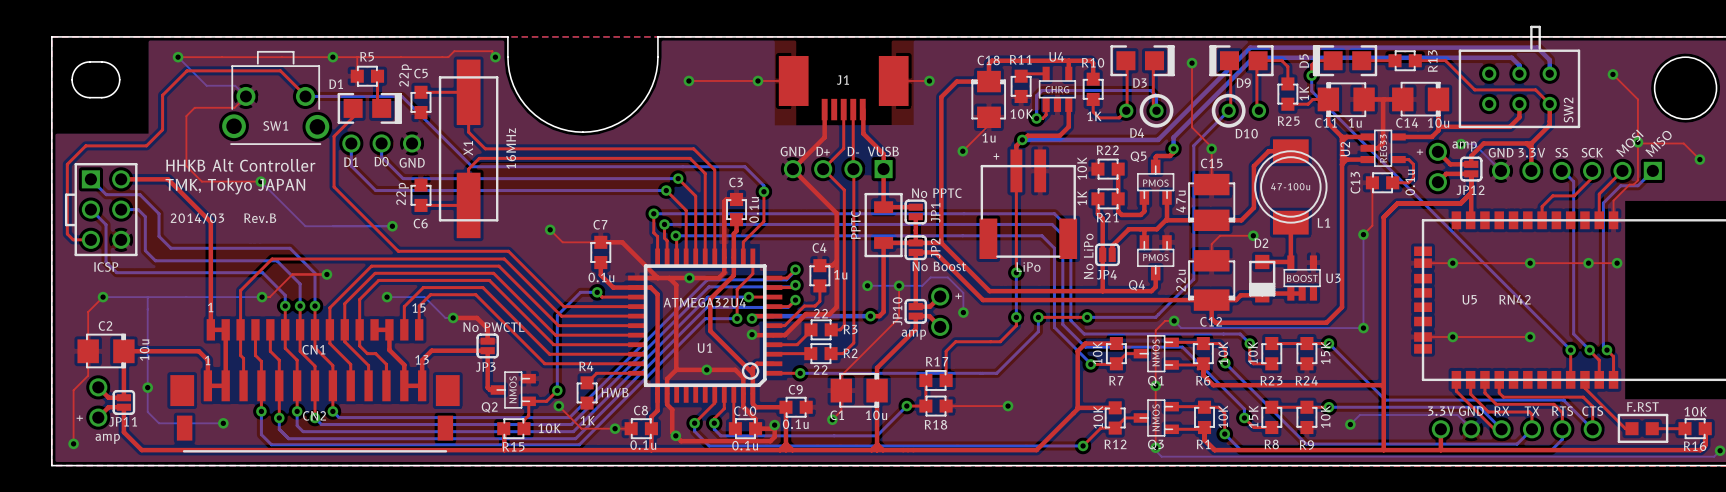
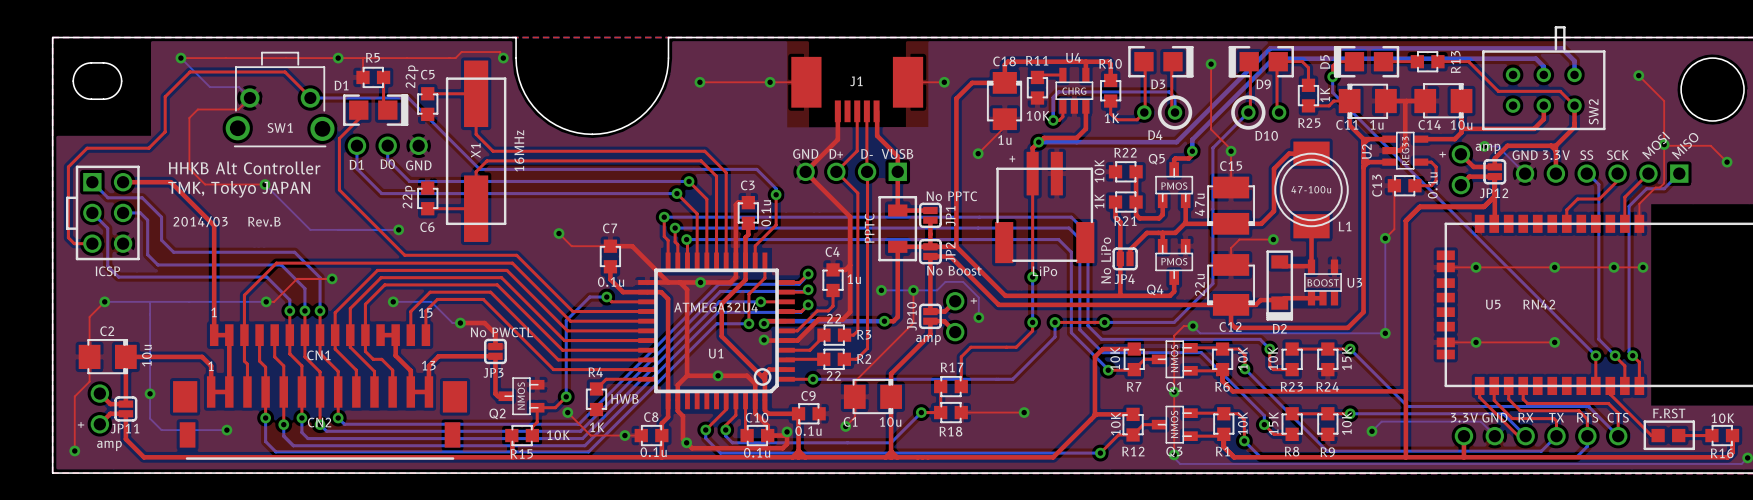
D2 name position: D2 (1261, 243) -> D2 (1279, 328)
D2 footprint: [1249, 254, 1276, 303] -> [1266, 250, 1294, 321]

